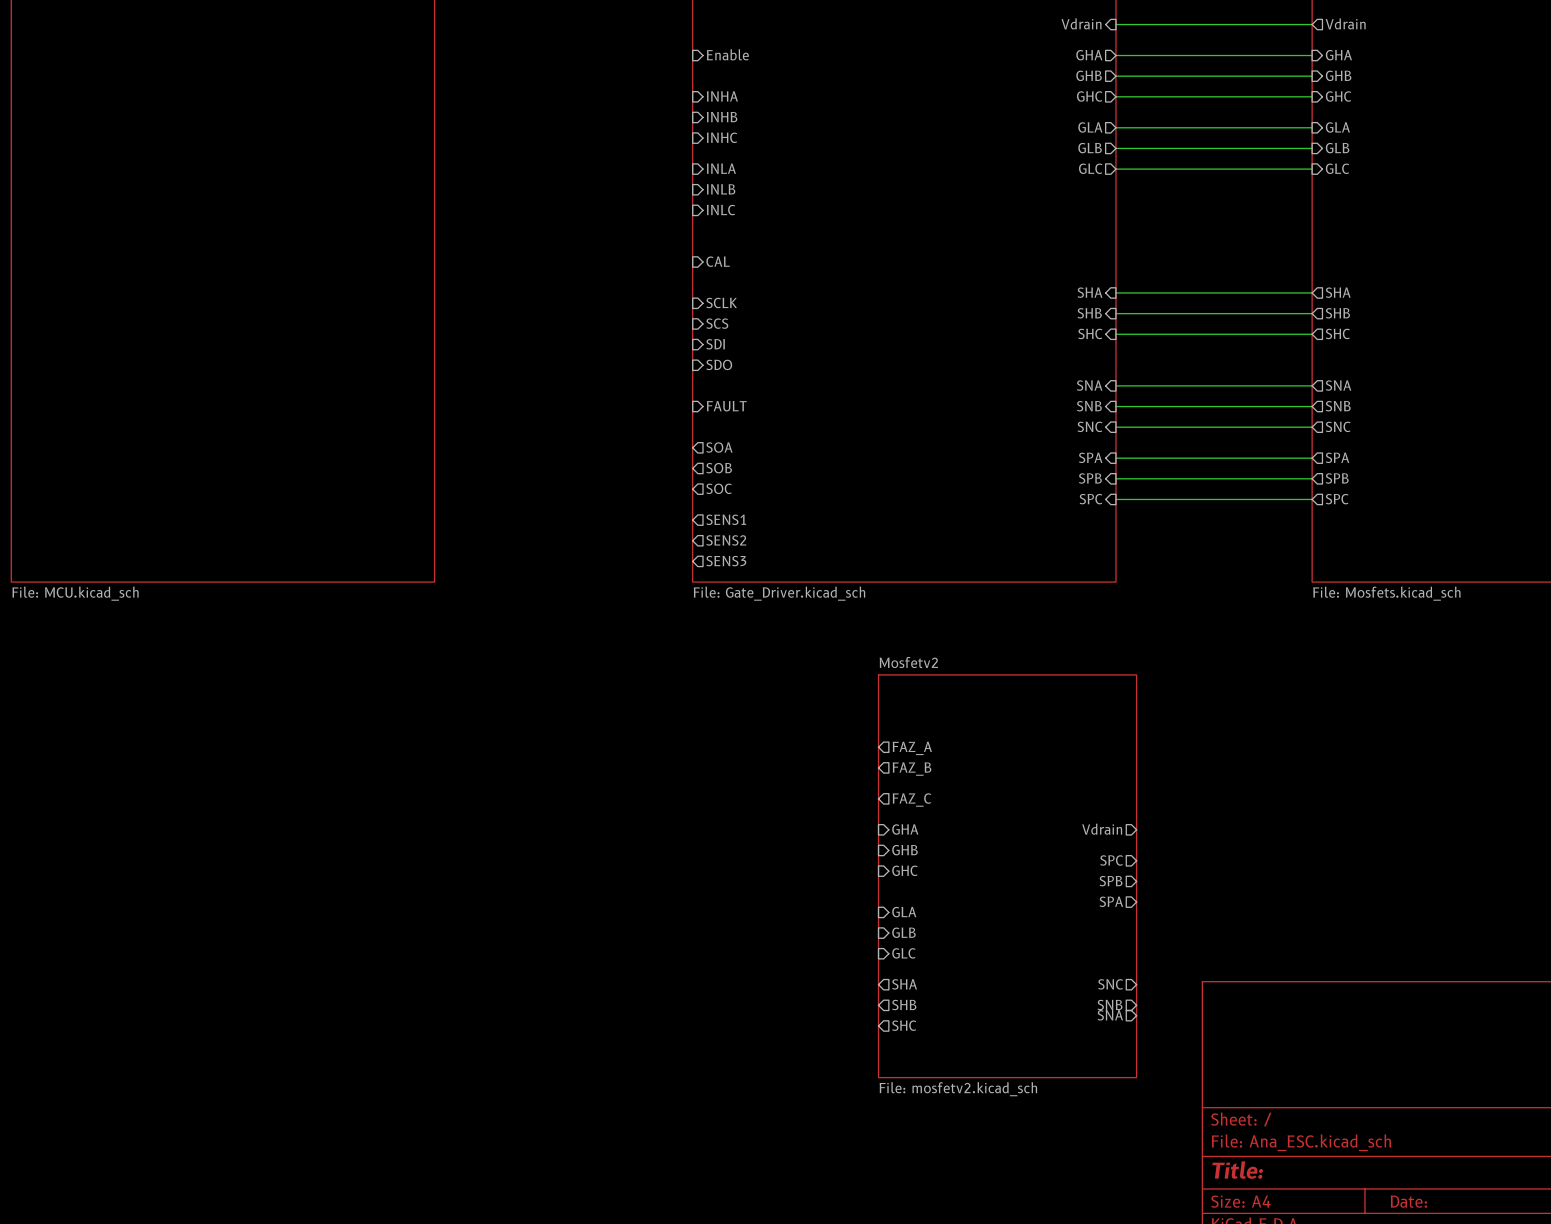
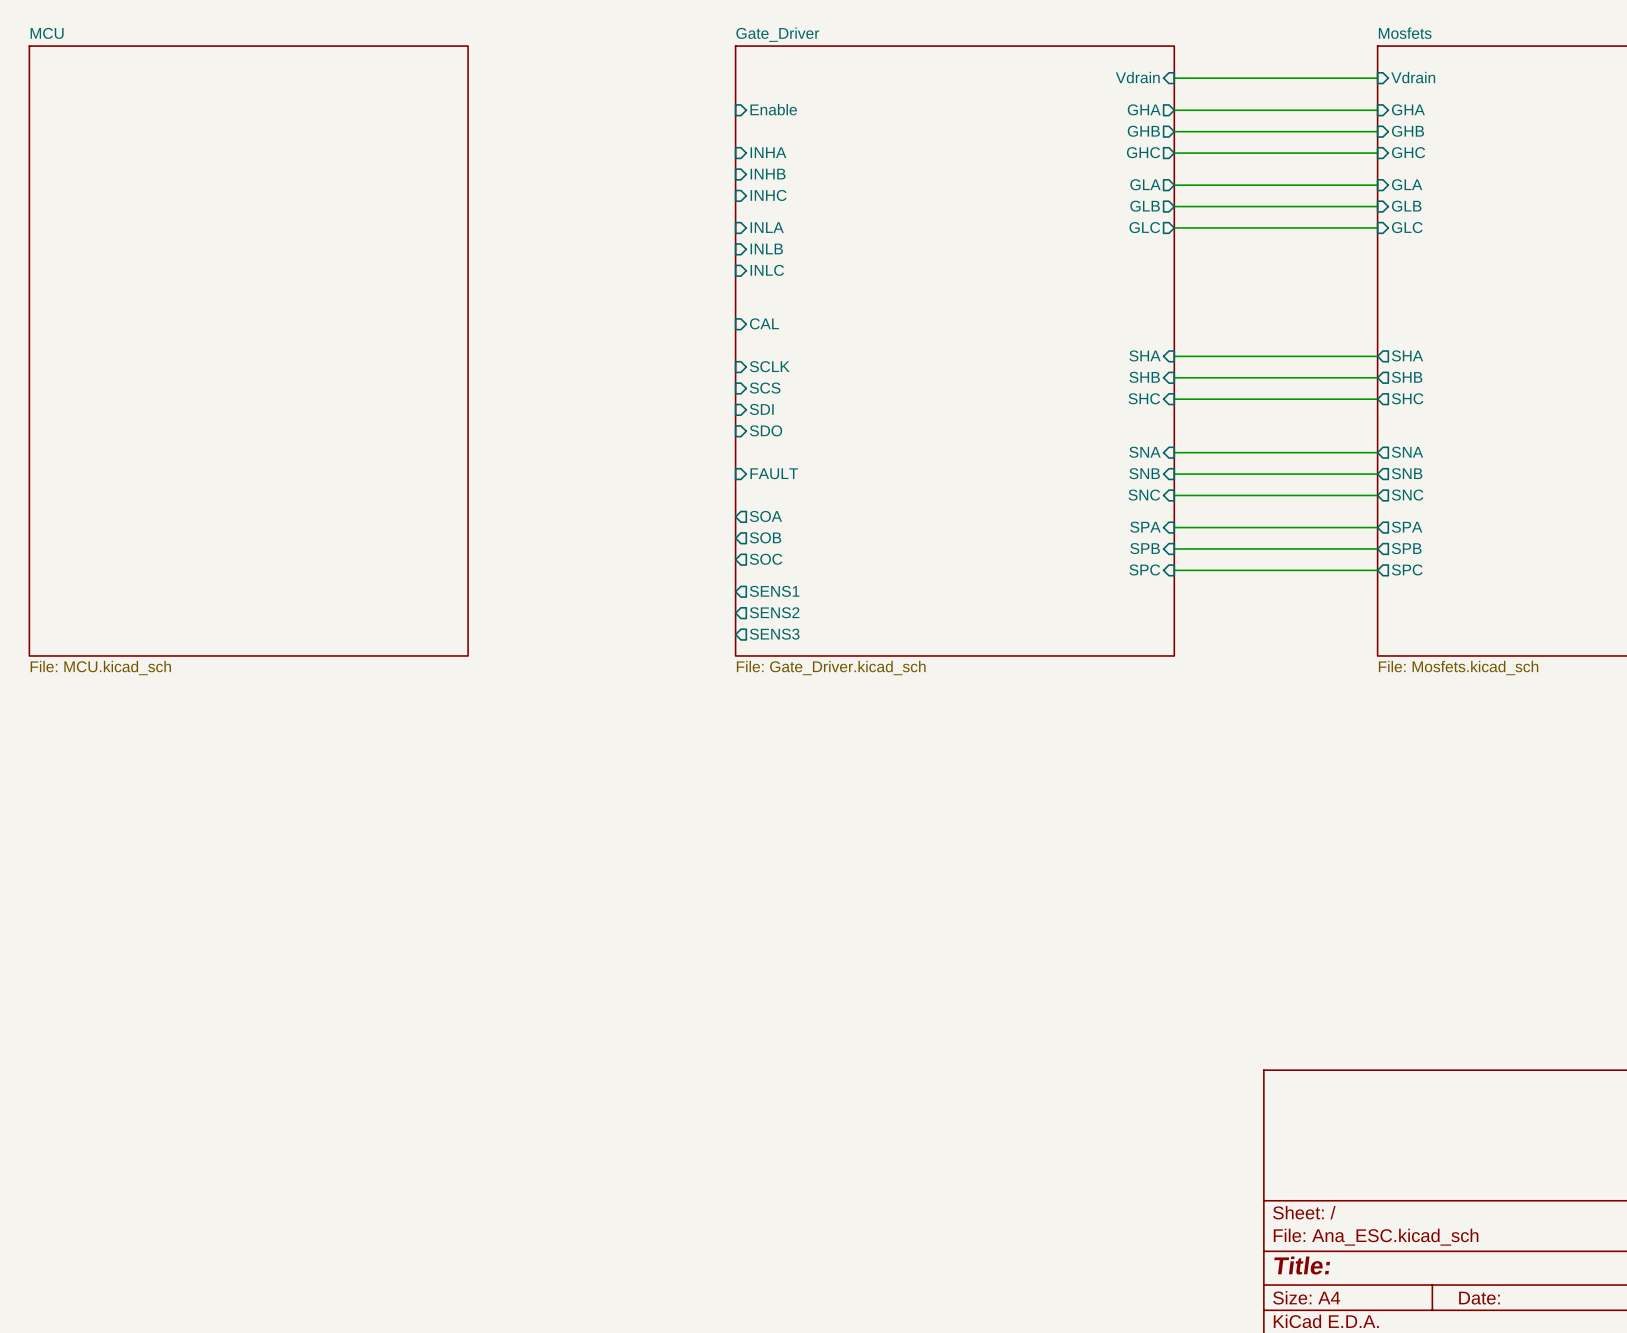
sheet pin shape: output (1345, 23) -> input (1413, 77)
sheet pin: FAZ_A (912, 748) -> none
sheet pin: FAZ_B (912, 769) -> none
sheet pin: FAZ_C (911, 800) -> none
sheet pin: GHA (905, 829) -> none
sheet pin: Vdrain (1102, 829) -> none
sheet pin: GHB (904, 850) -> none
sheet pin: SPC (1111, 860) -> none
sheet pin: GHC (904, 870) -> none
sheet Mosfetv2: File: mosfetv2.kicad_sch (1007, 876) -> none
sheet pin: SPB (1111, 881) -> none
sheet pin: SPA (1111, 901) -> none
sheet pin: GLA (904, 912) -> none
sheet pin: GLB (903, 932) -> none
sheet pin: GLC (903, 953) -> none
sheet pin: SHA (904, 984) -> none
sheet pin: SNC (1110, 984) -> none
sheet pin: SHB (904, 1005) -> none
sheet pin: SNB (1110, 1005) -> none
sheet pin: SNA (1110, 1015) -> none
sheet pin: SHC (904, 1025) -> none

